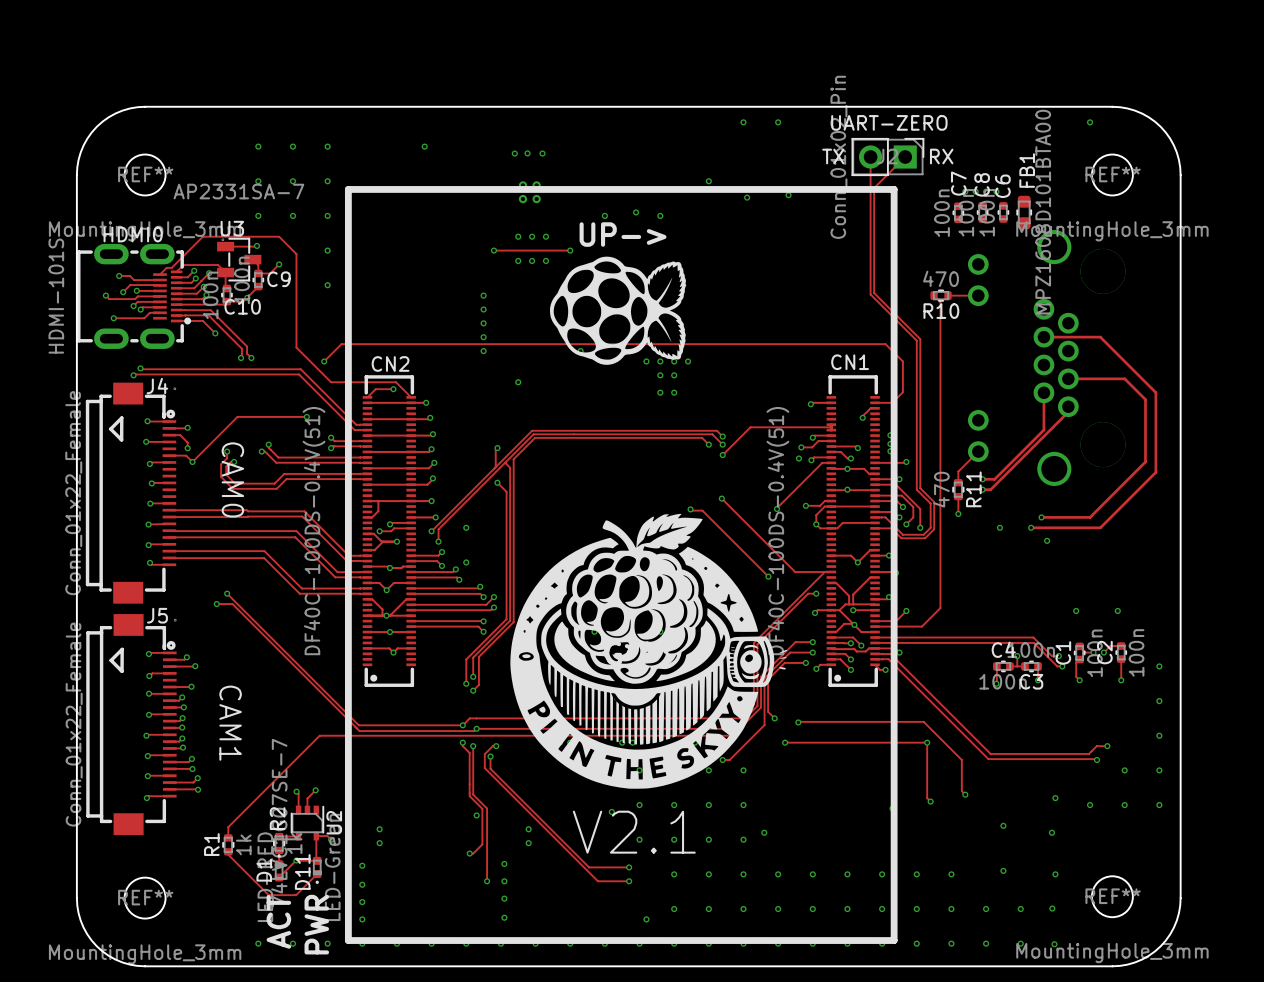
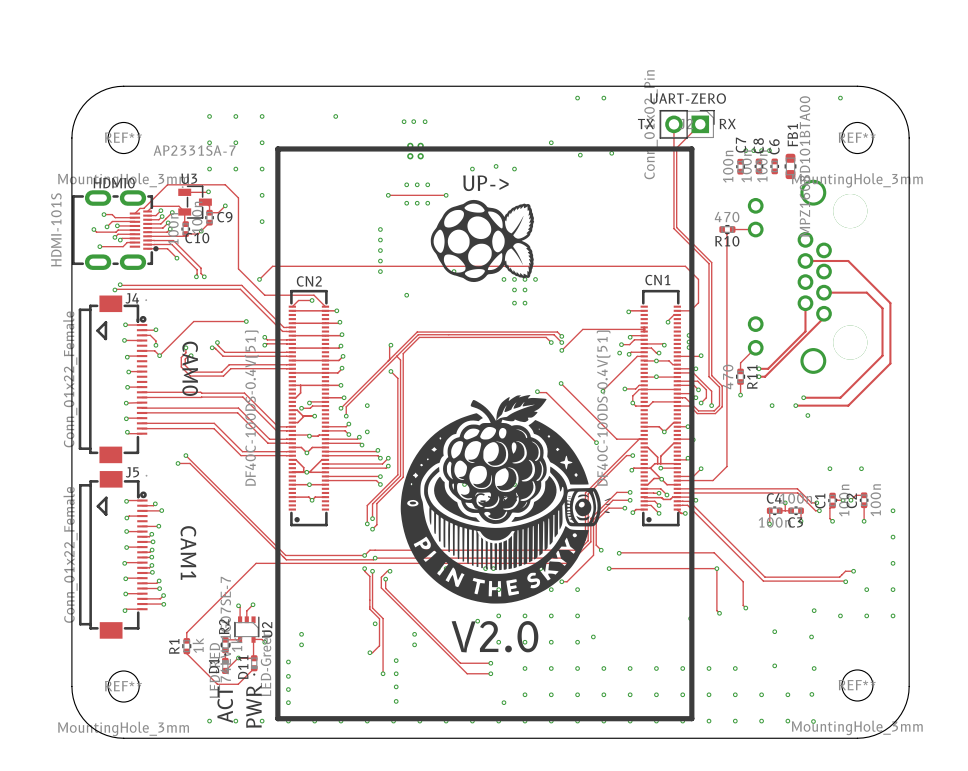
text: V2.1 (634, 832) -> V2.0 (494, 636)

